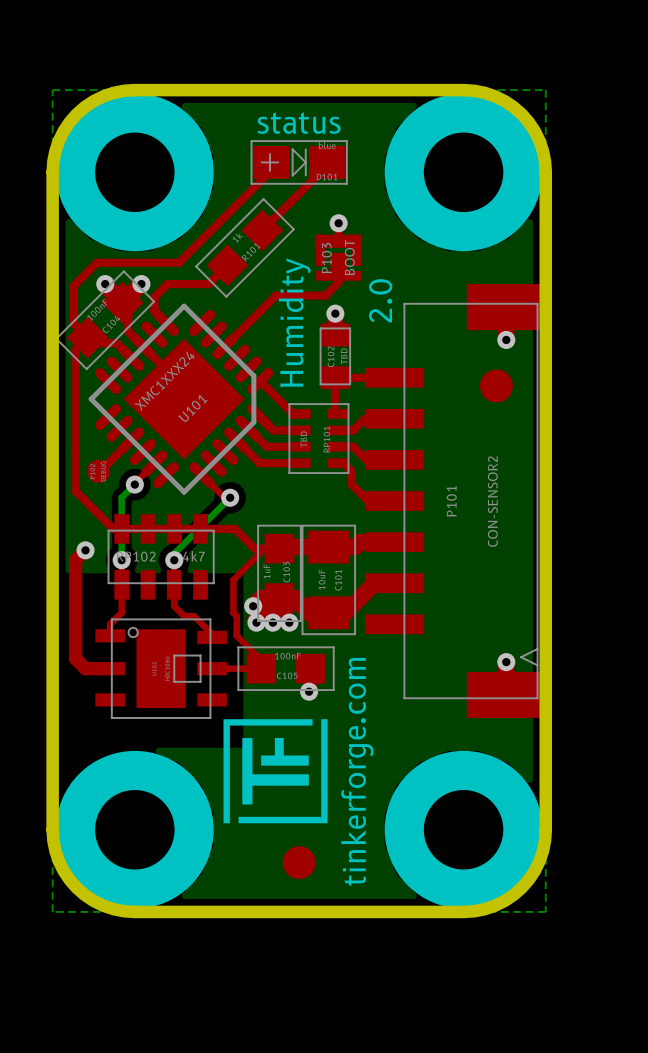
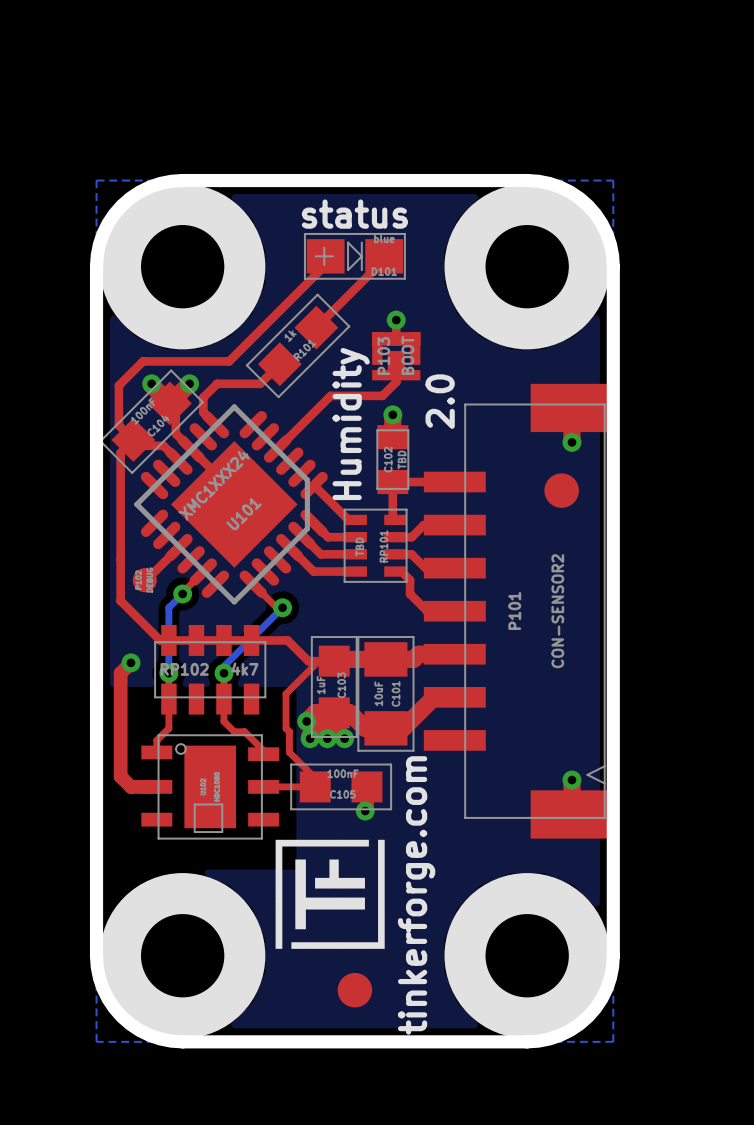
part footprint: [95, 618, 227, 719] -> [141, 734, 280, 840]

